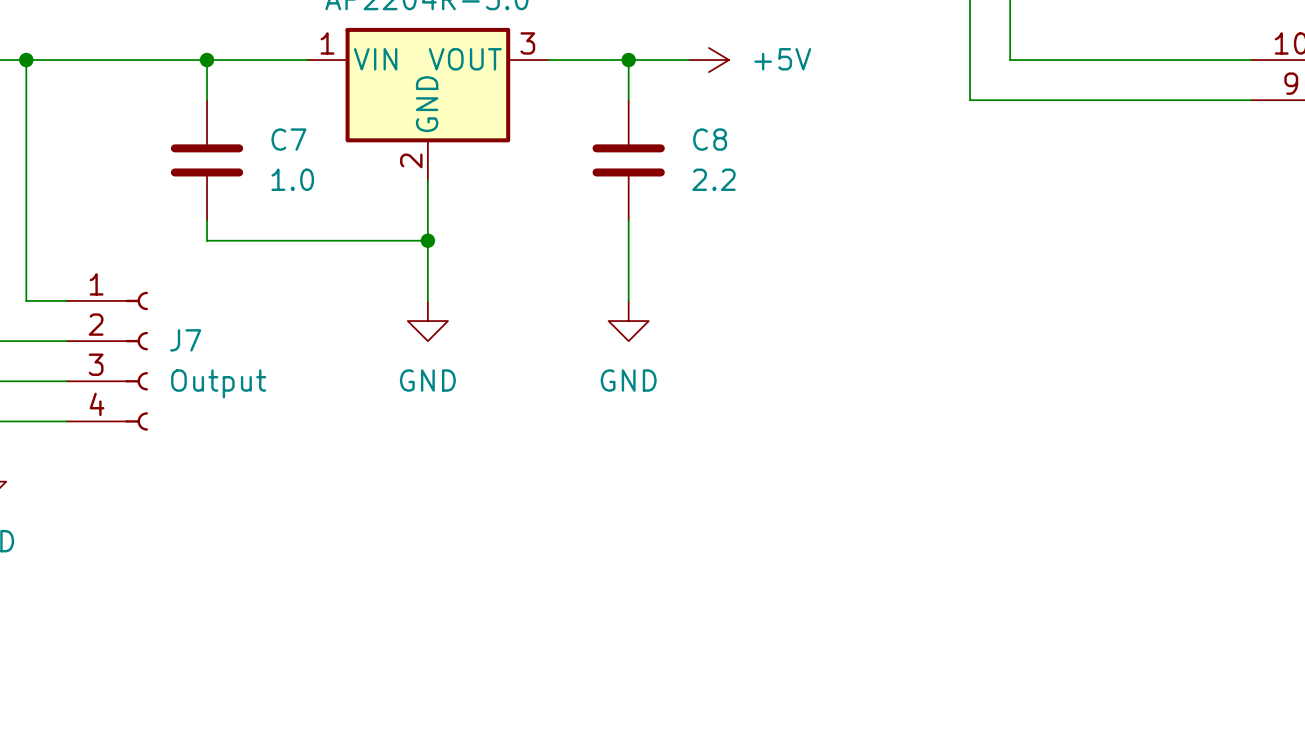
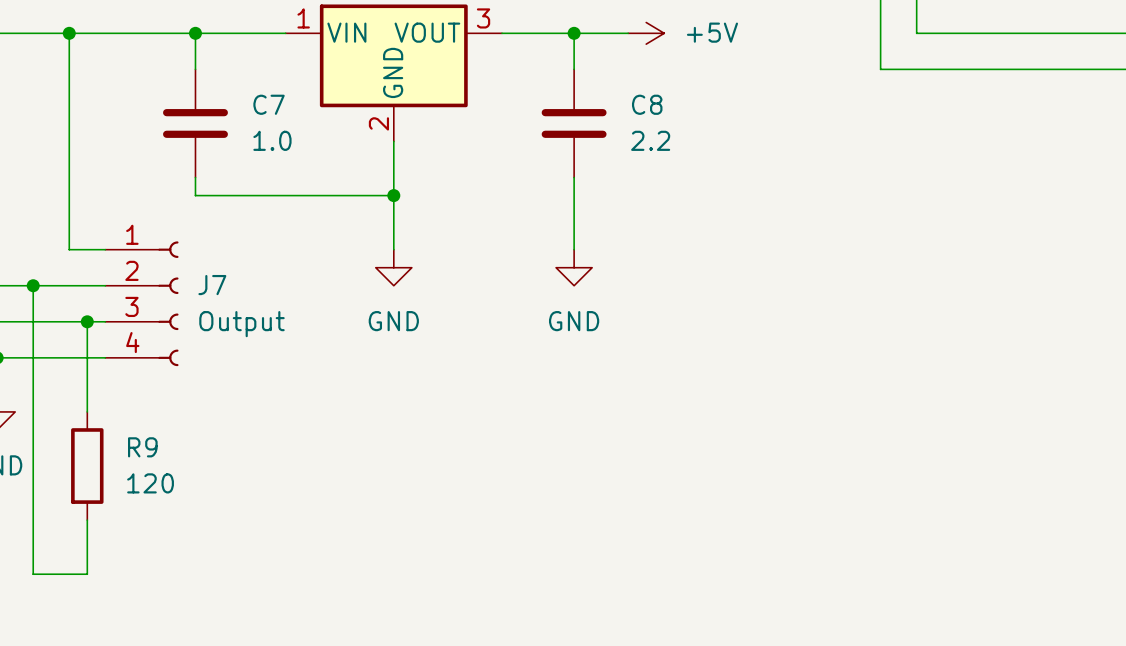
wire: (26, 60) (26, 300) (66, 300) -> (69, 33) (69, 249) (105, 249)
junction position: (26, 60) -> (69, 33)
wire: none -> (33, 285) (33, 574) (87, 574) (87, 520)
junction: none -> (33, 285)
J7 position: (107, 361) -> (141, 303)
wire: none -> (87, 321) (87, 411)
junction: none -> (87, 321)
R9: none -> 120 (87, 466)

